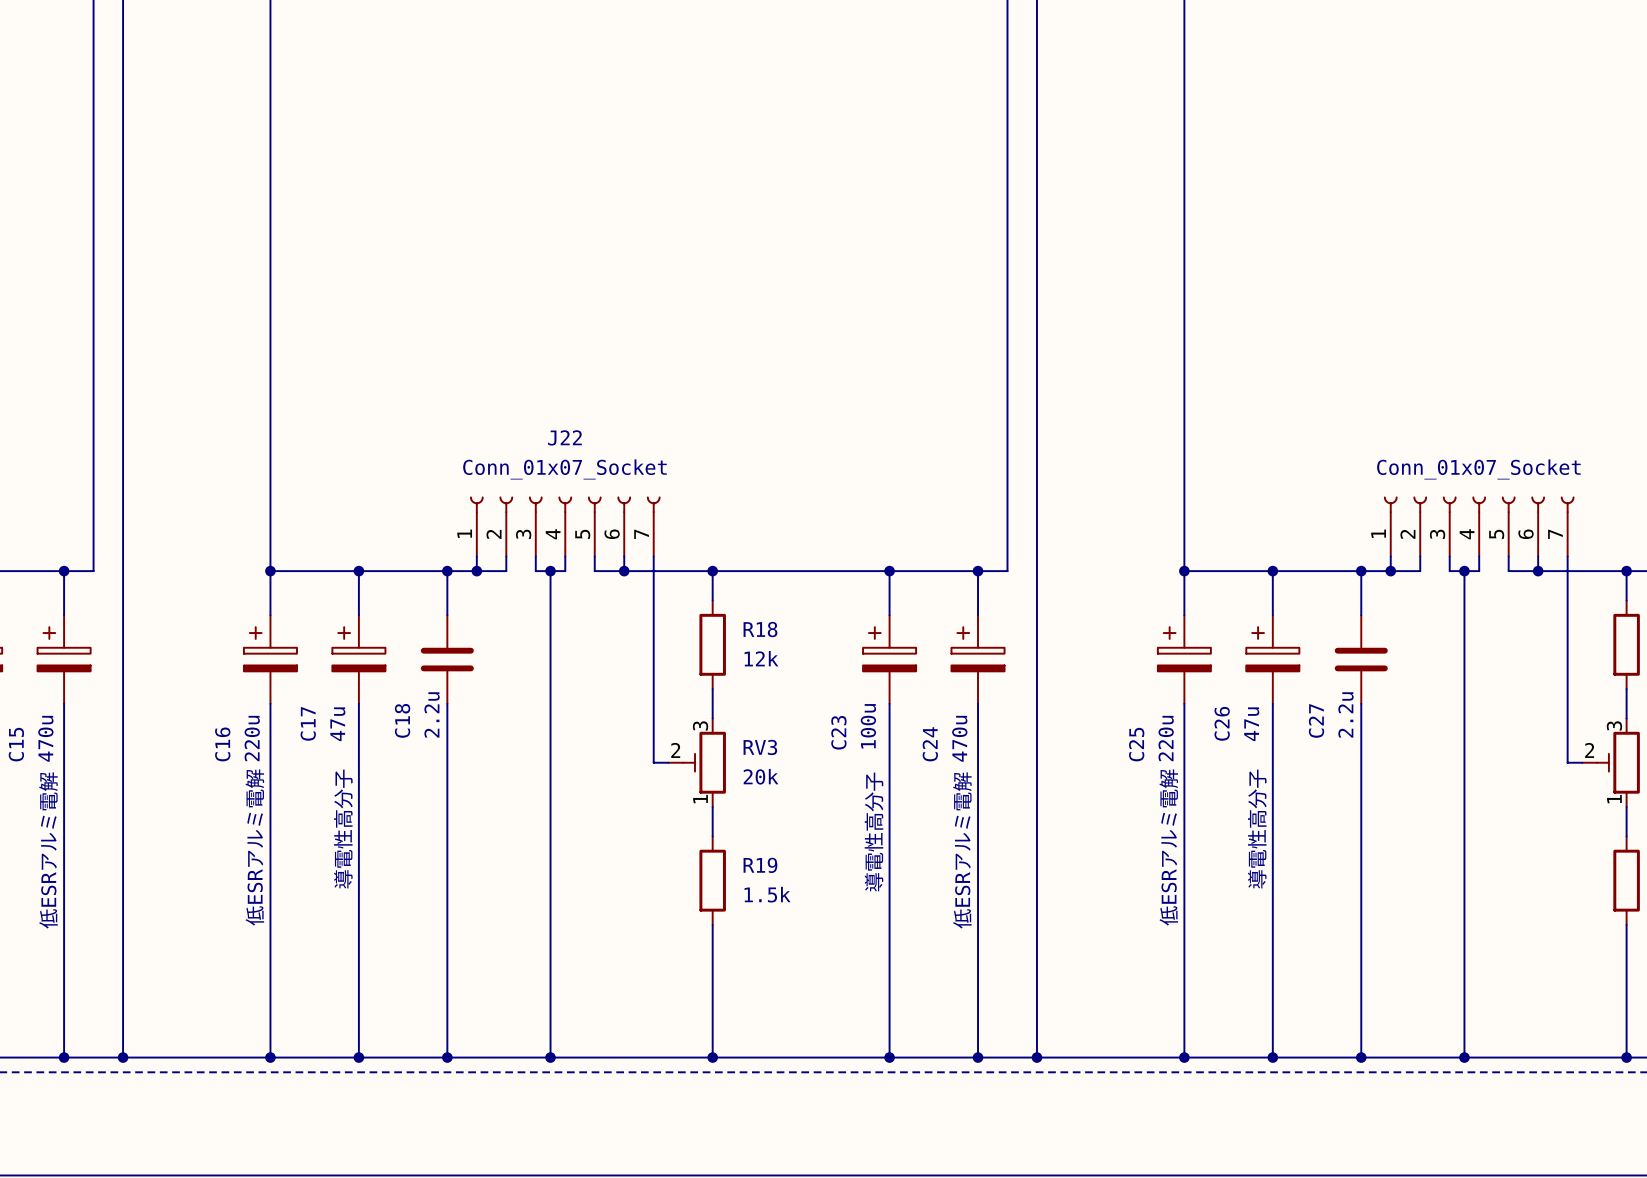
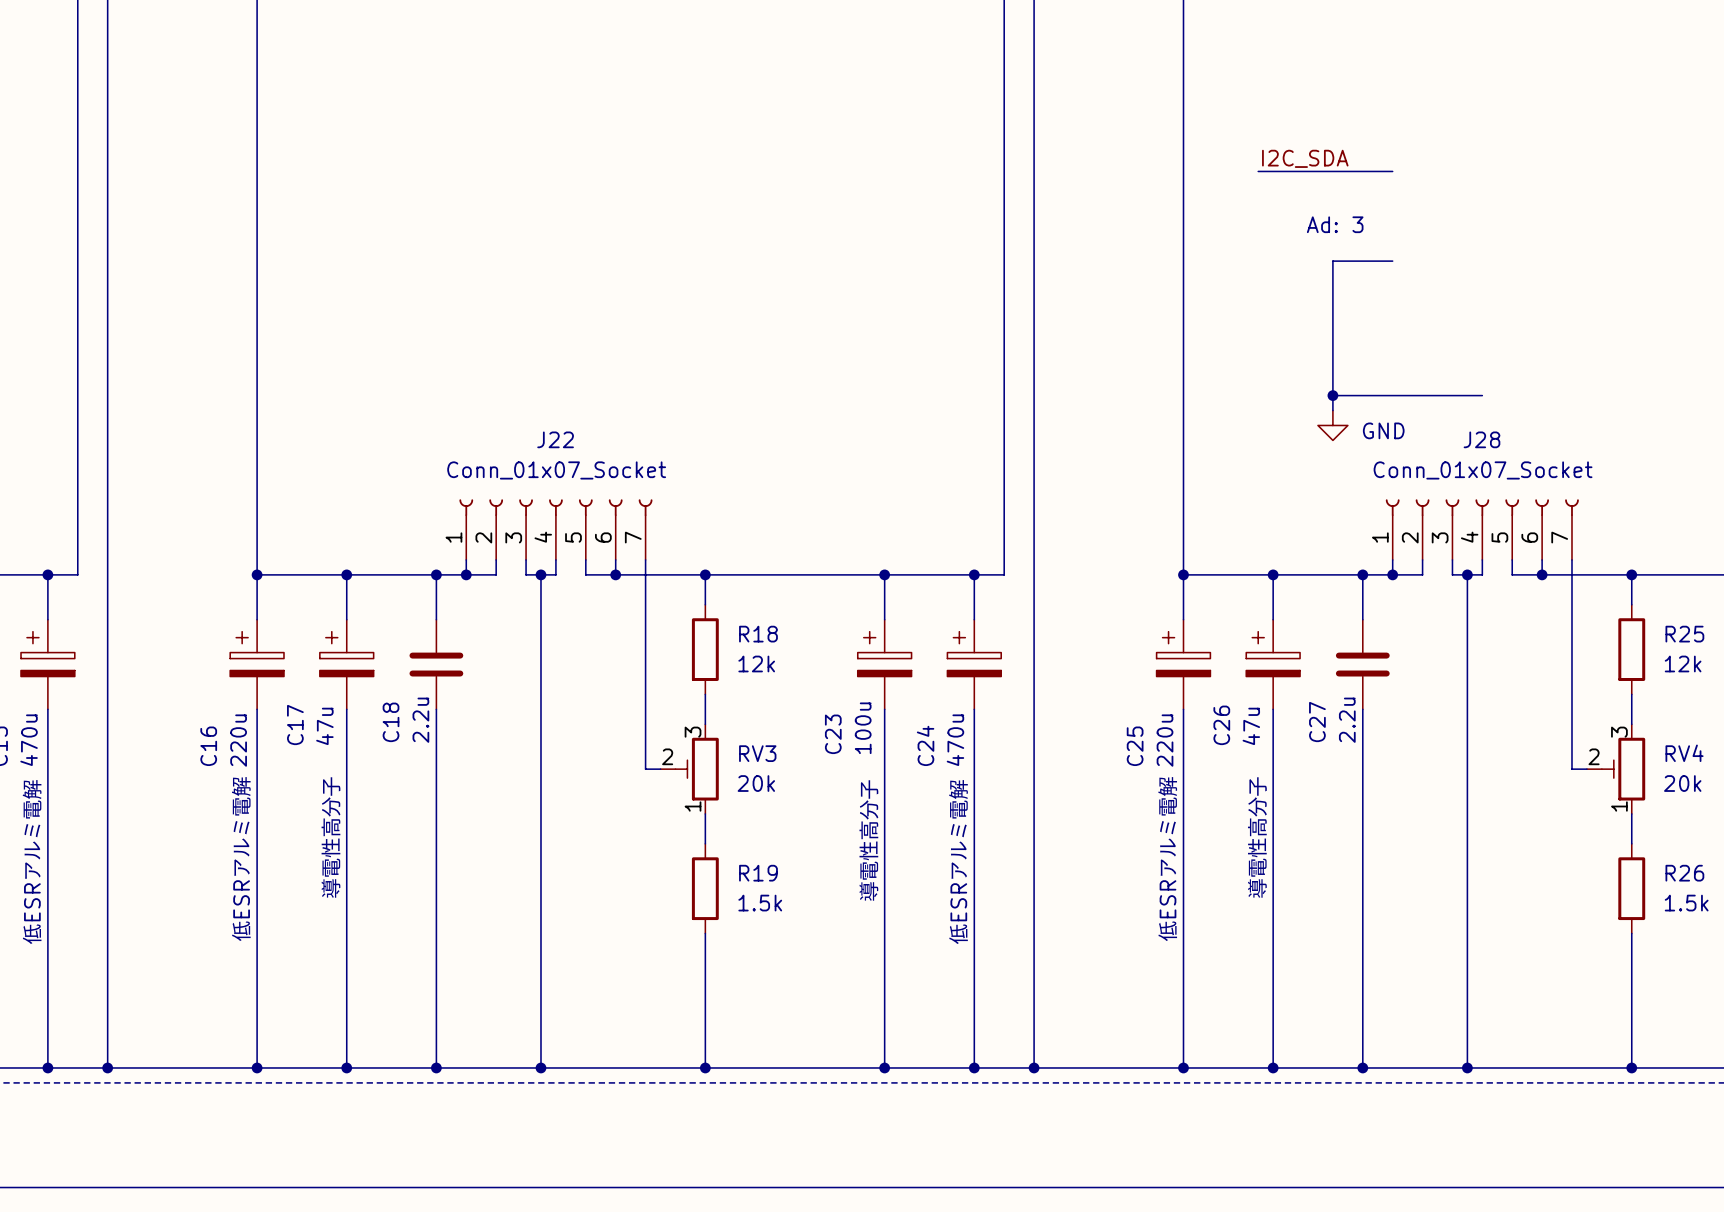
label: none -> I2C_SDA (1305, 158)
wire: none -> (1258, 171) (1392, 171)
text: none -> Ad: 3 (1335, 224)
wire: none -> (1392, 261) (1332, 261) (1332, 410)
wire: none -> (1332, 395) (1482, 395)
junction: none -> (1332, 395)
power symbol: none -> GND (1332, 425)
J28 name: none -> J28 (1481, 439)

